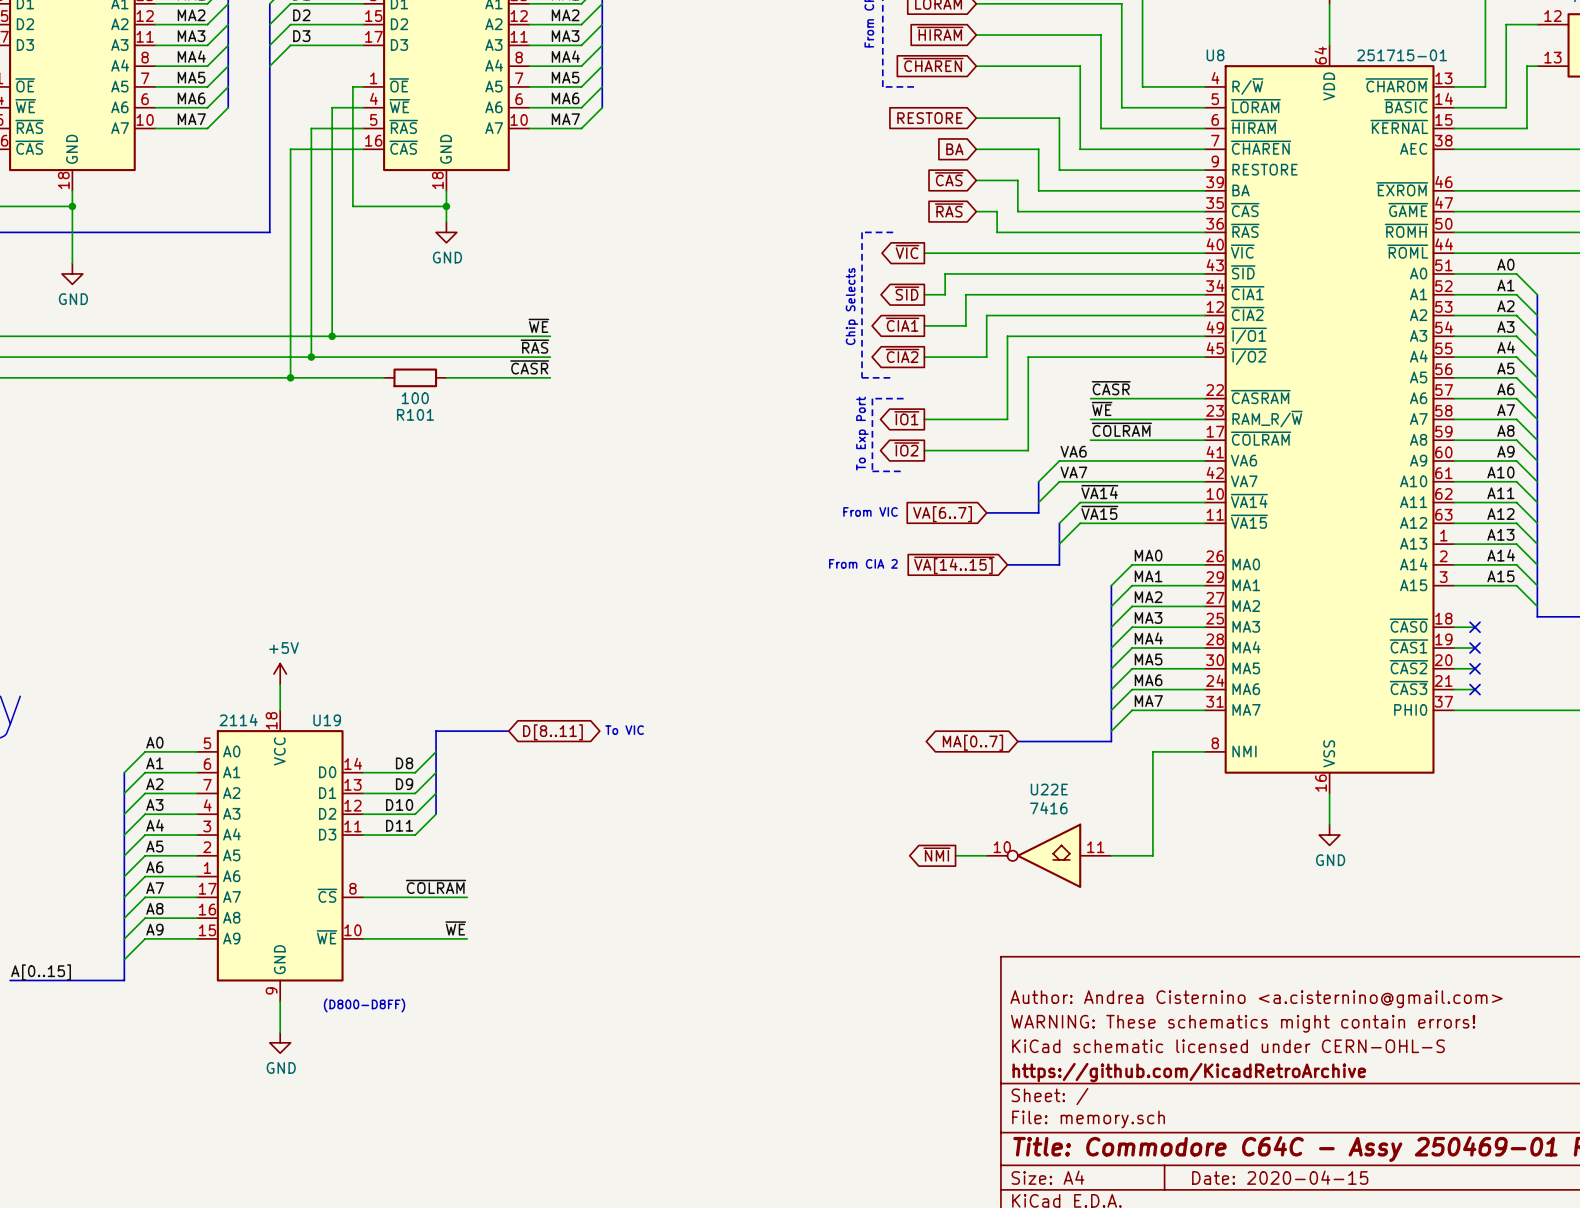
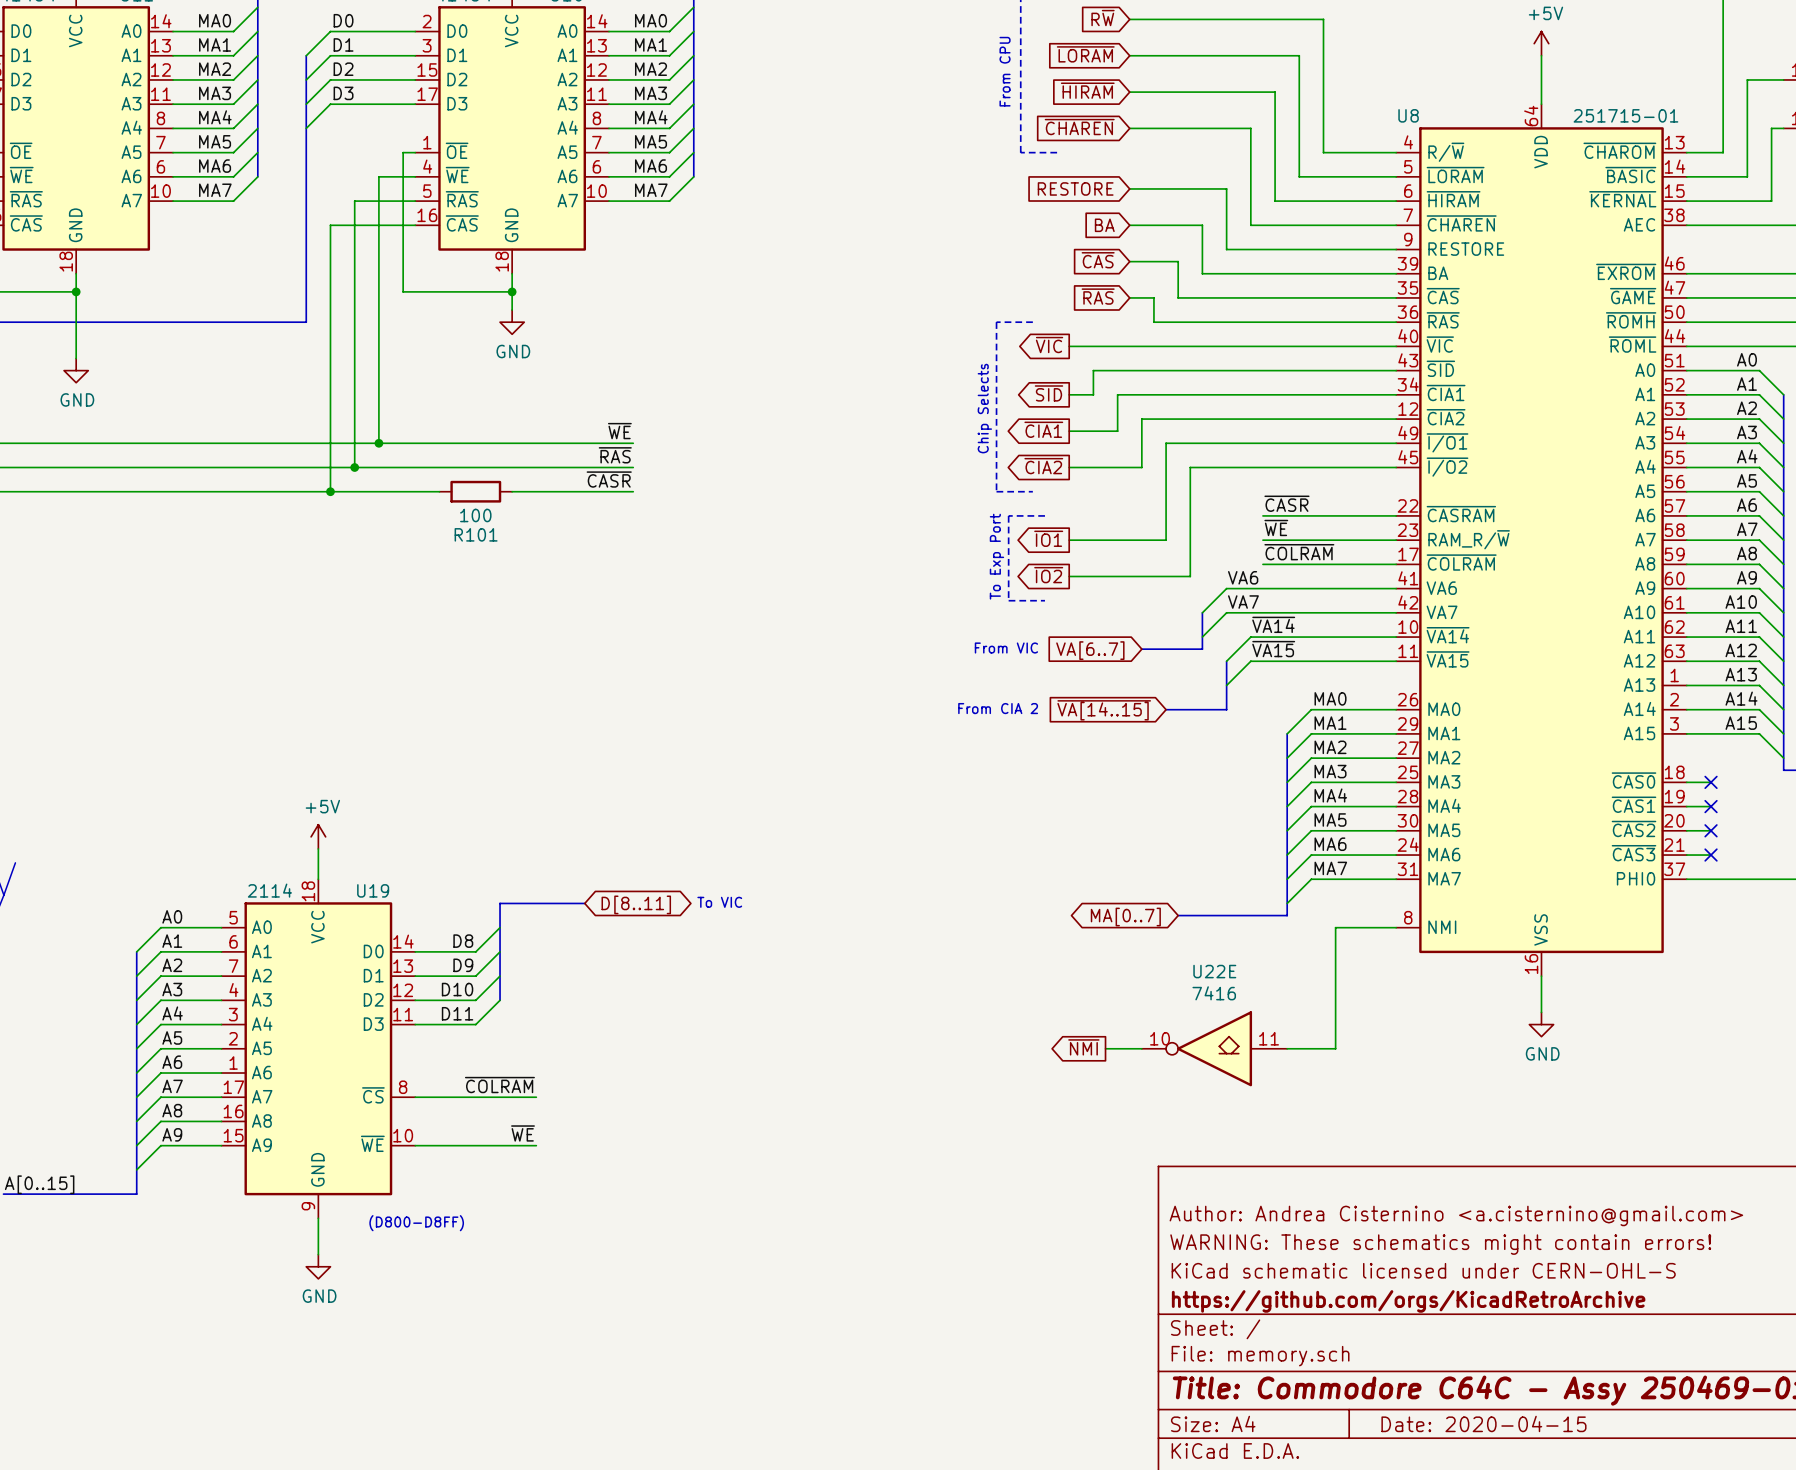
title block: https://github.com/KicadRetroArchive (1189, 1072) -> https://github.com/orgs/KicadRetroArchive (1408, 1301)

